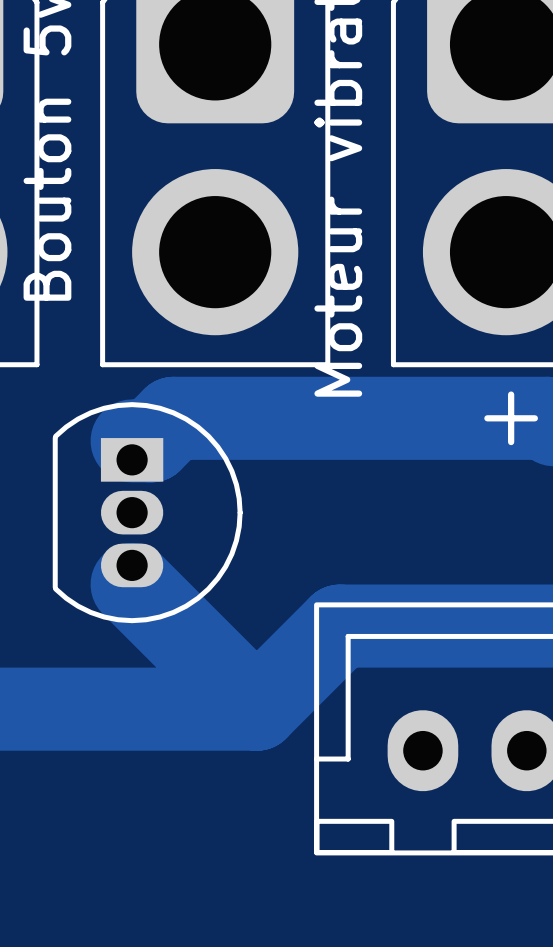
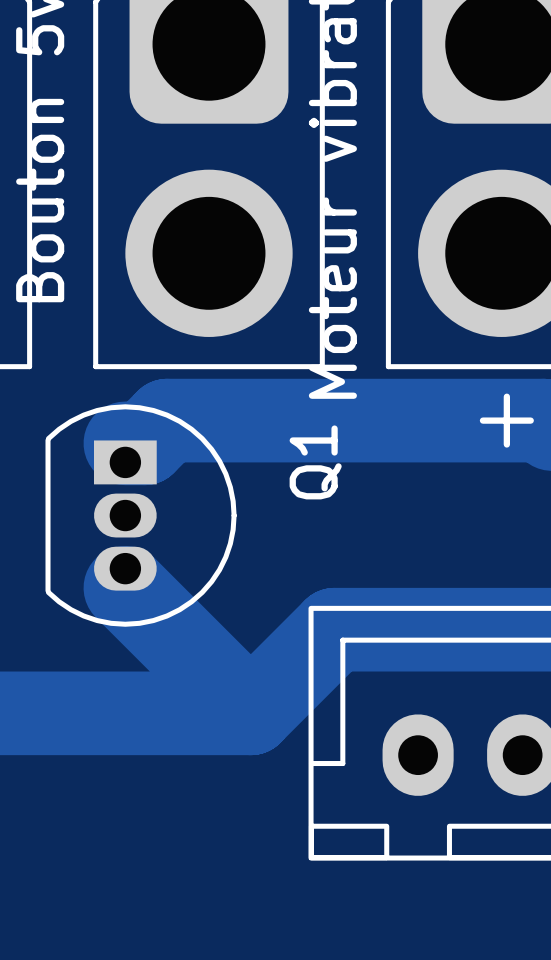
Q1 name: none -> Q1 (315, 462)

